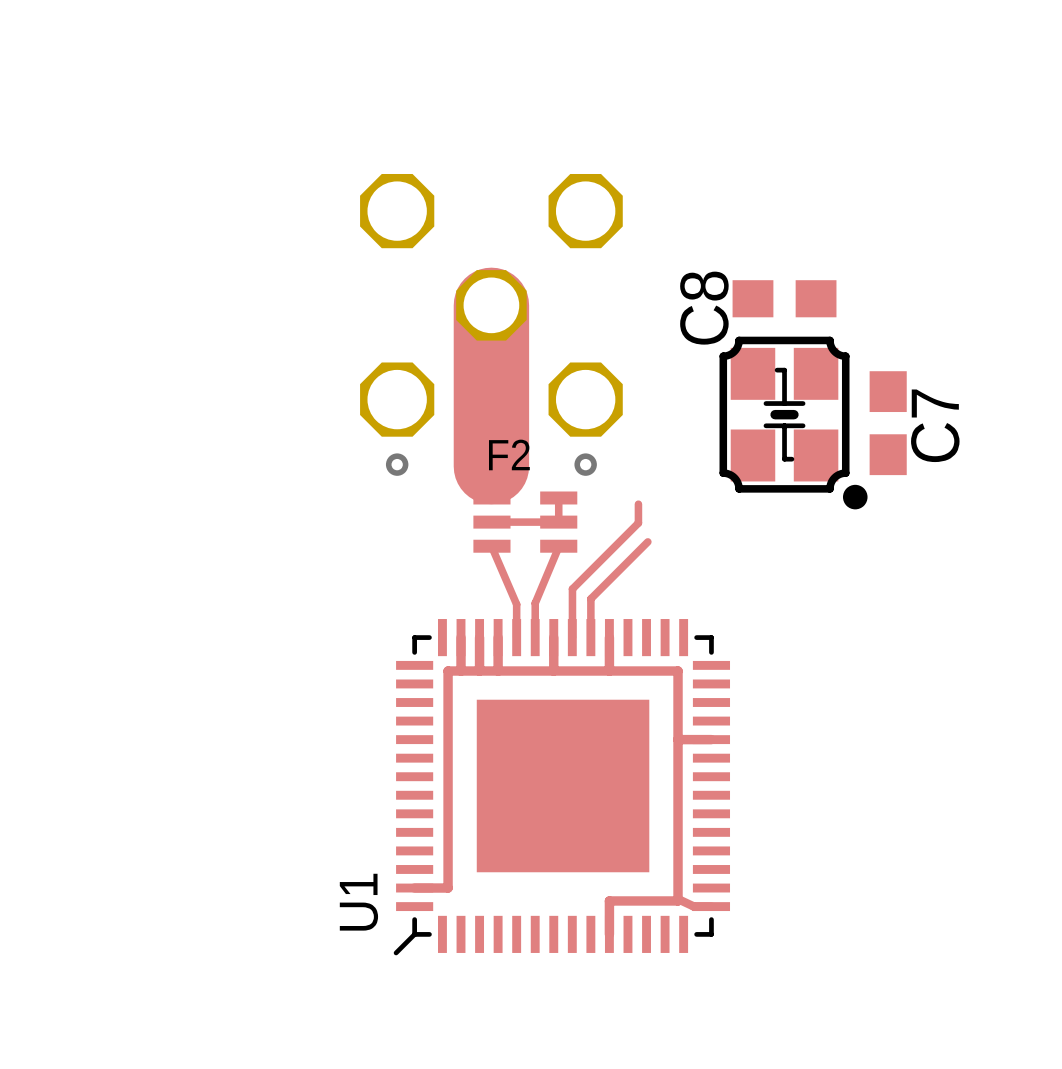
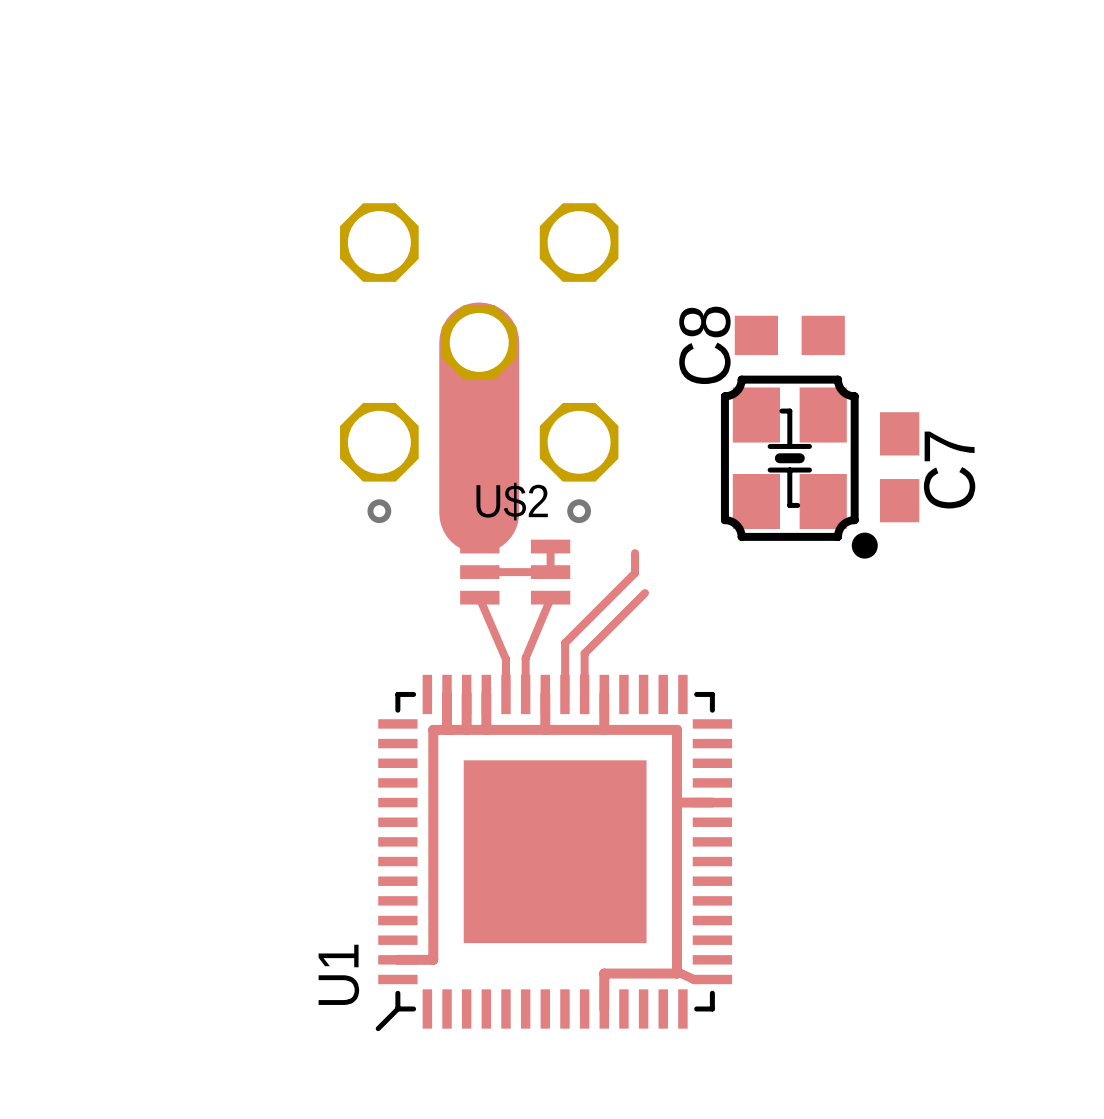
F2 name: F2 (509, 454) -> U$2 (512, 501)

